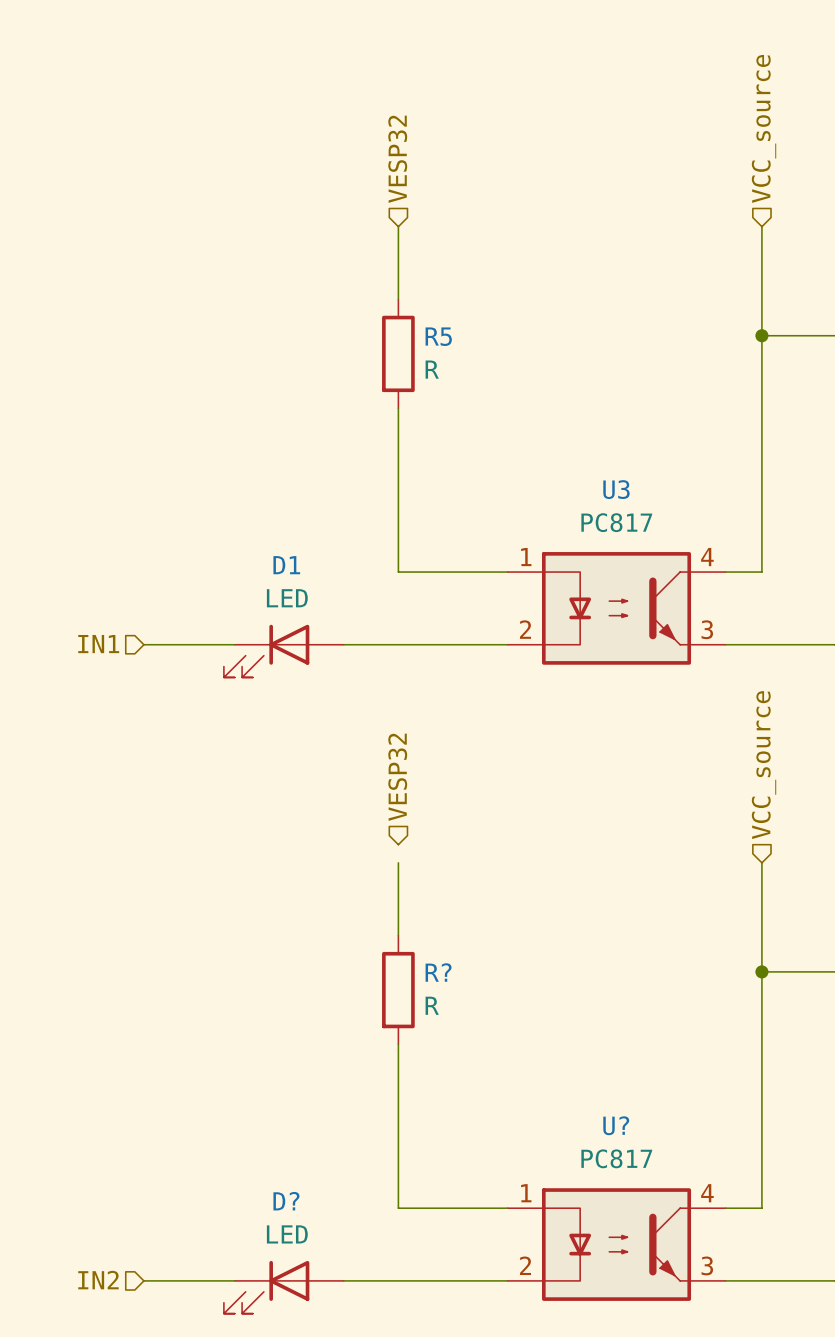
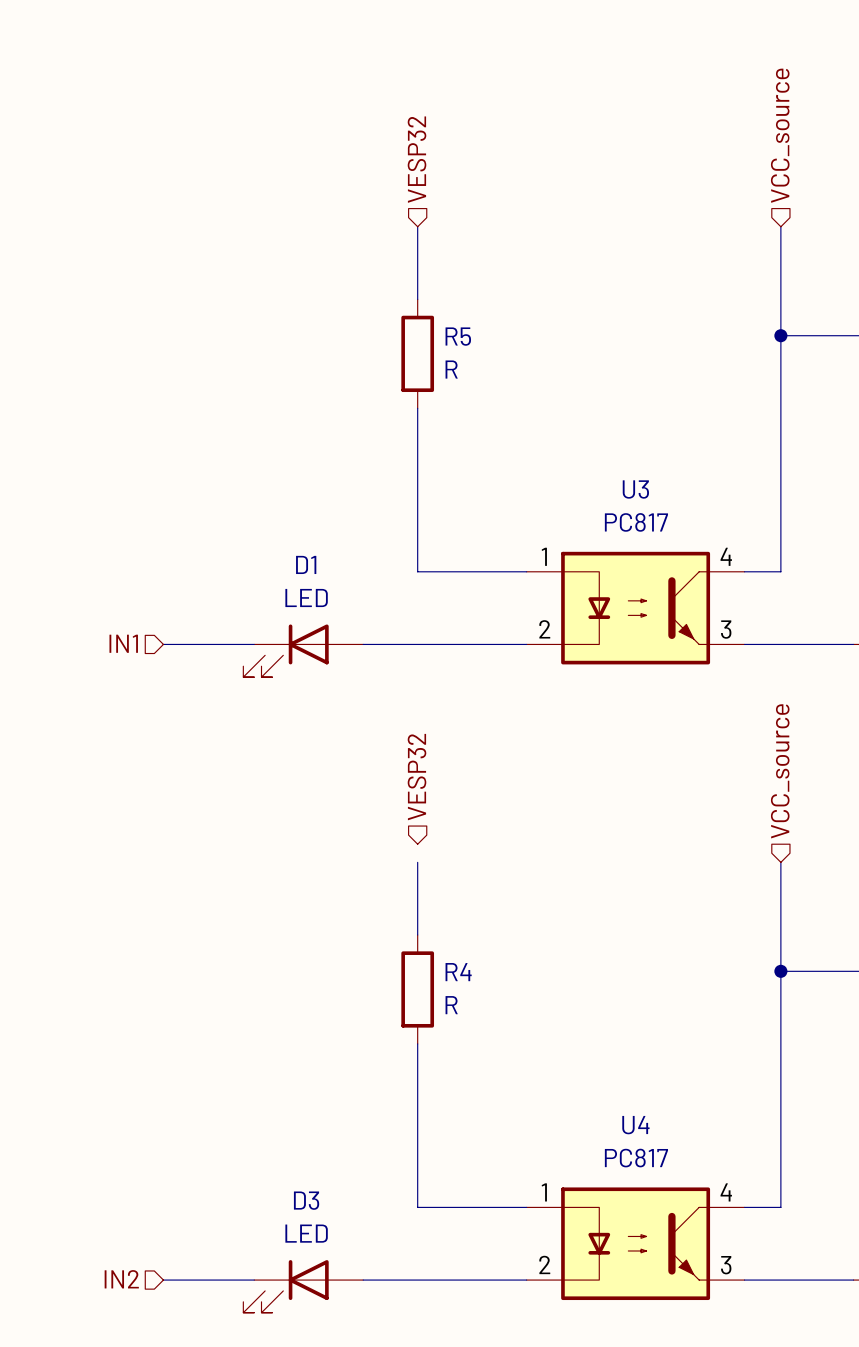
R? name: R? (438, 972) -> R4 (458, 972)
U? name: U? (616, 1125) -> U4 (635, 1125)
D? name: D? (286, 1201) -> D3 (306, 1200)

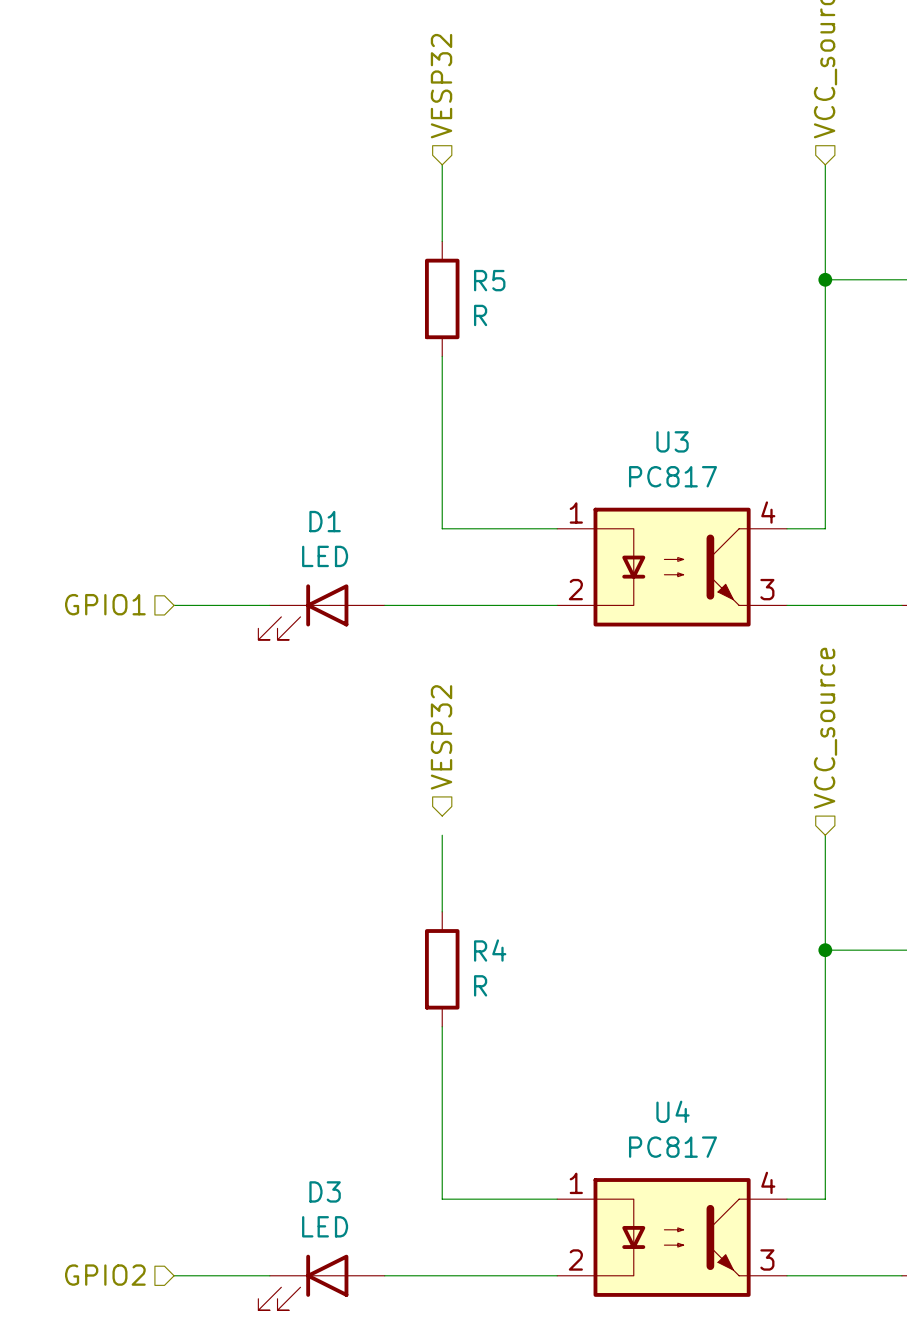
hierarchical label: IN1 (123, 643) -> GPIO1 (105, 604)
hierarchical label: IN2 (121, 1279) -> GPIO2 (105, 1275)

